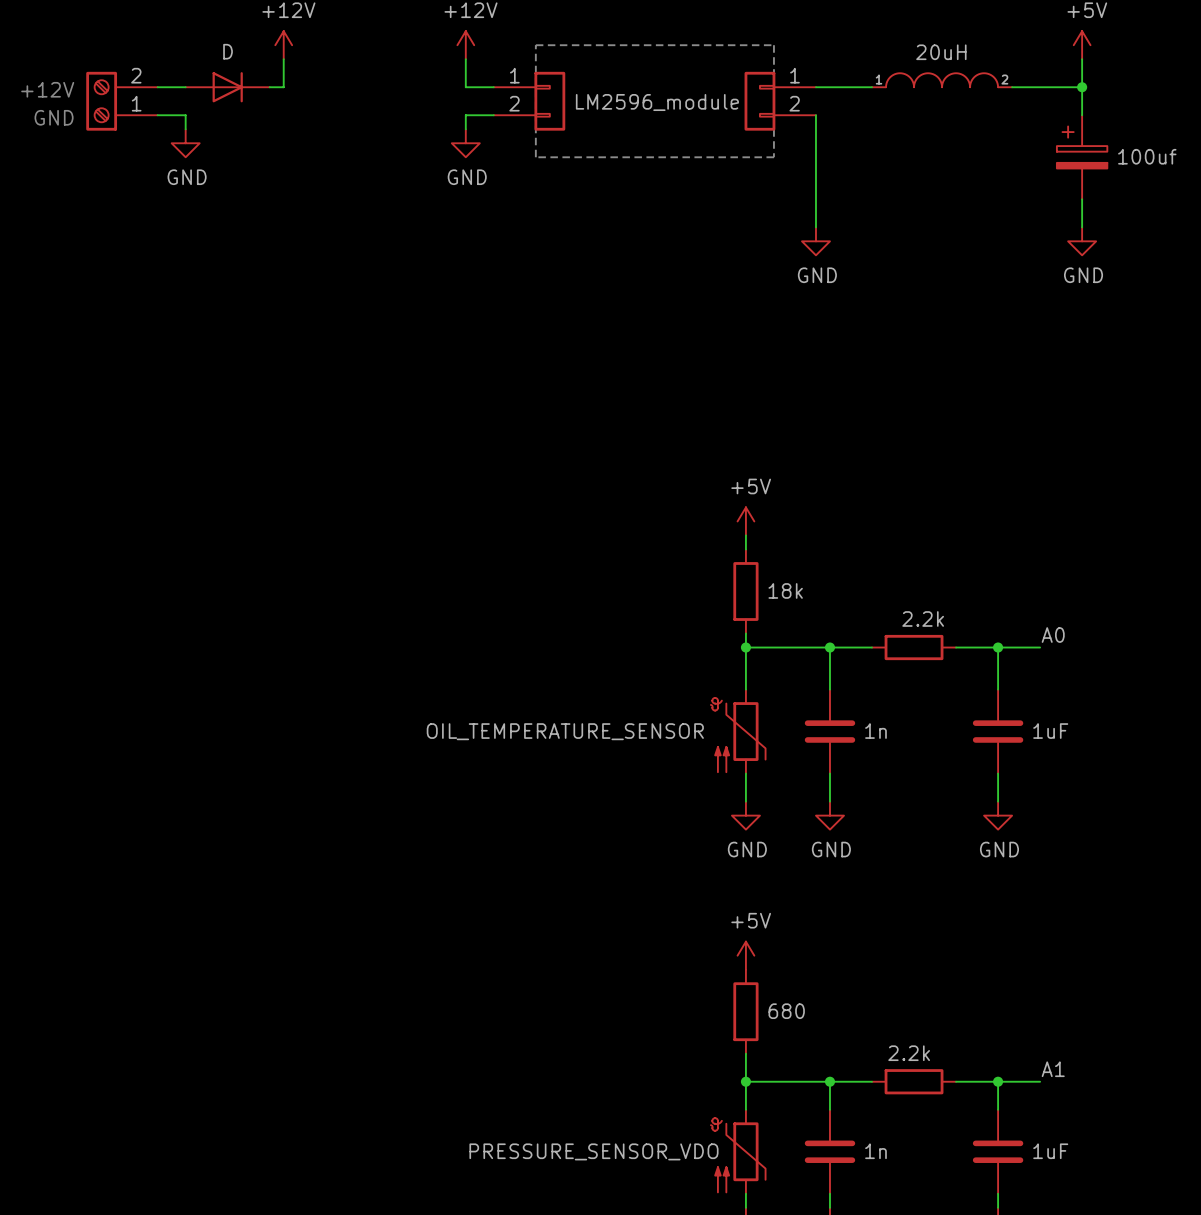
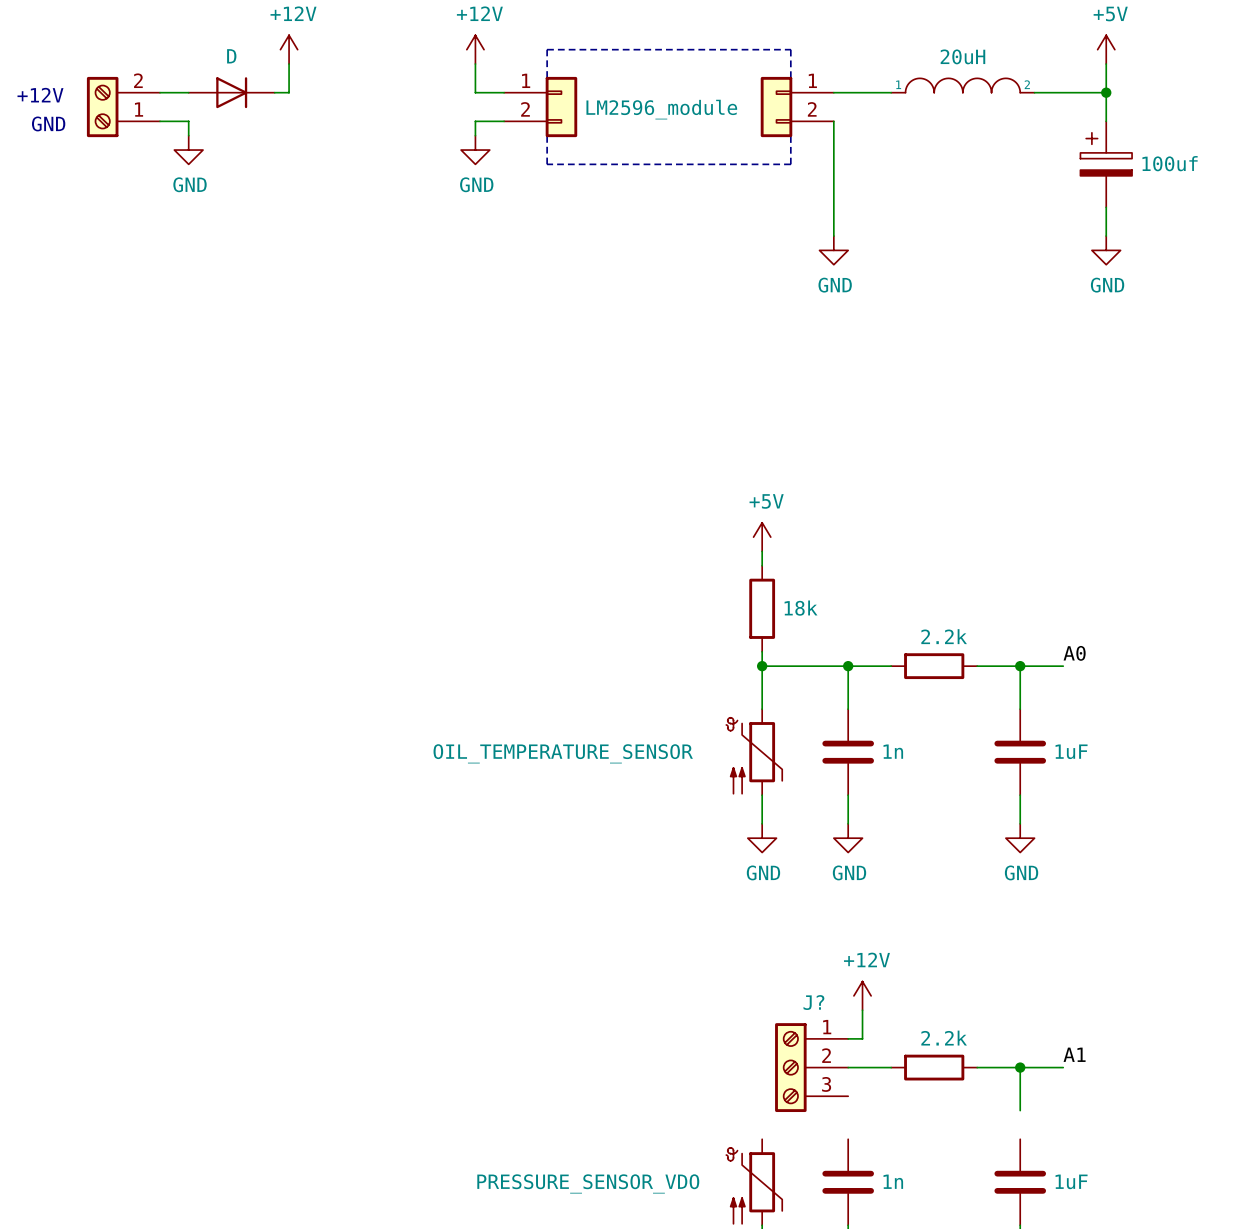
power symbol: +5V (745, 955) -> none
power symbol: none -> +12V (862, 995)
wire: none -> (862, 1010) (862, 1038) (848, 1038)
part: 680 (745, 1011) -> none
J?: none -> (811, 1067)
wire: none -> (848, 1067) (891, 1067)
wire: (745, 1053) (745, 1109) -> none
part value position: 2.2k (909, 1053) -> 2.2k (944, 1038)
label position: A1 (1053, 1069) -> A1 (1074, 1054)
wire: (745, 1081) (872, 1081) -> none
junction: (745, 1081) -> none
wire: (829, 1081) (829, 1109) -> none
junction: (829, 1081) -> none
part position: (914, 1081) -> (934, 1067)
wire: (956, 1081) (1040, 1081) -> (977, 1067) (1063, 1067)
wire: (998, 1081) (998, 1109) -> (1020, 1110) (1020, 1067)
junction position: (998, 1081) -> (1020, 1067)

